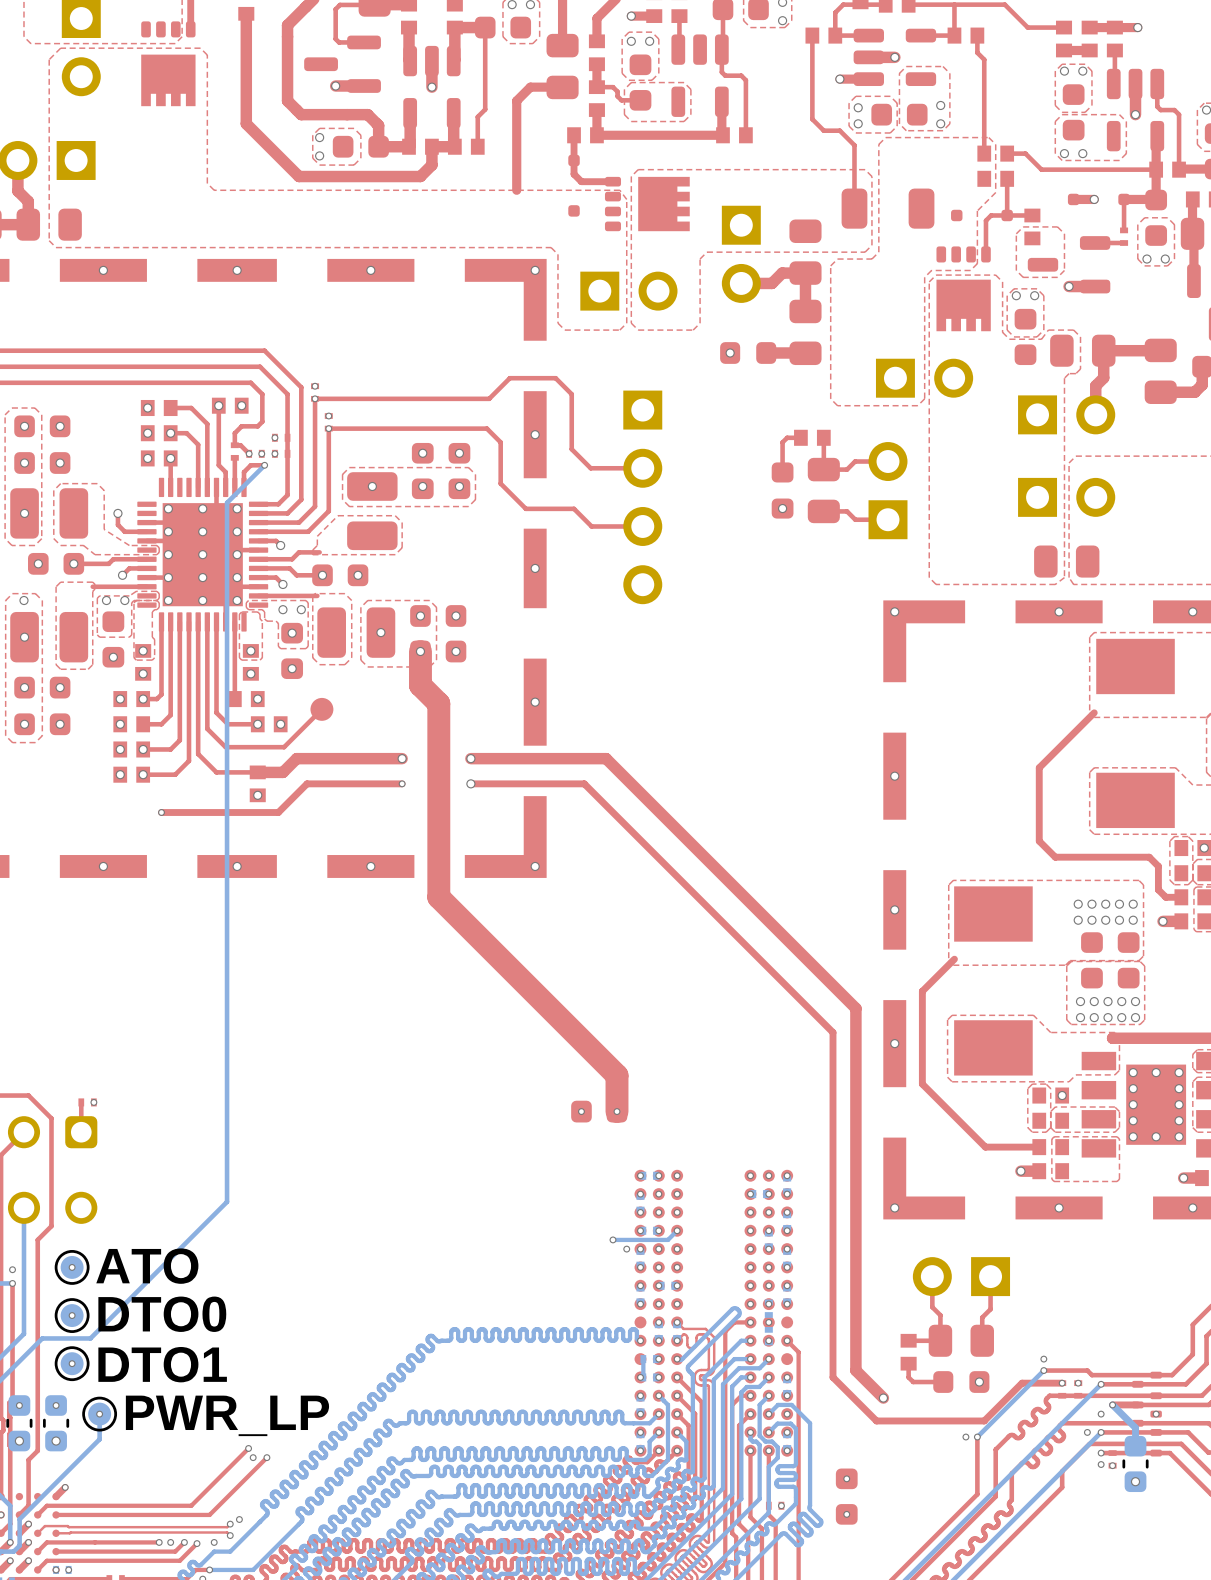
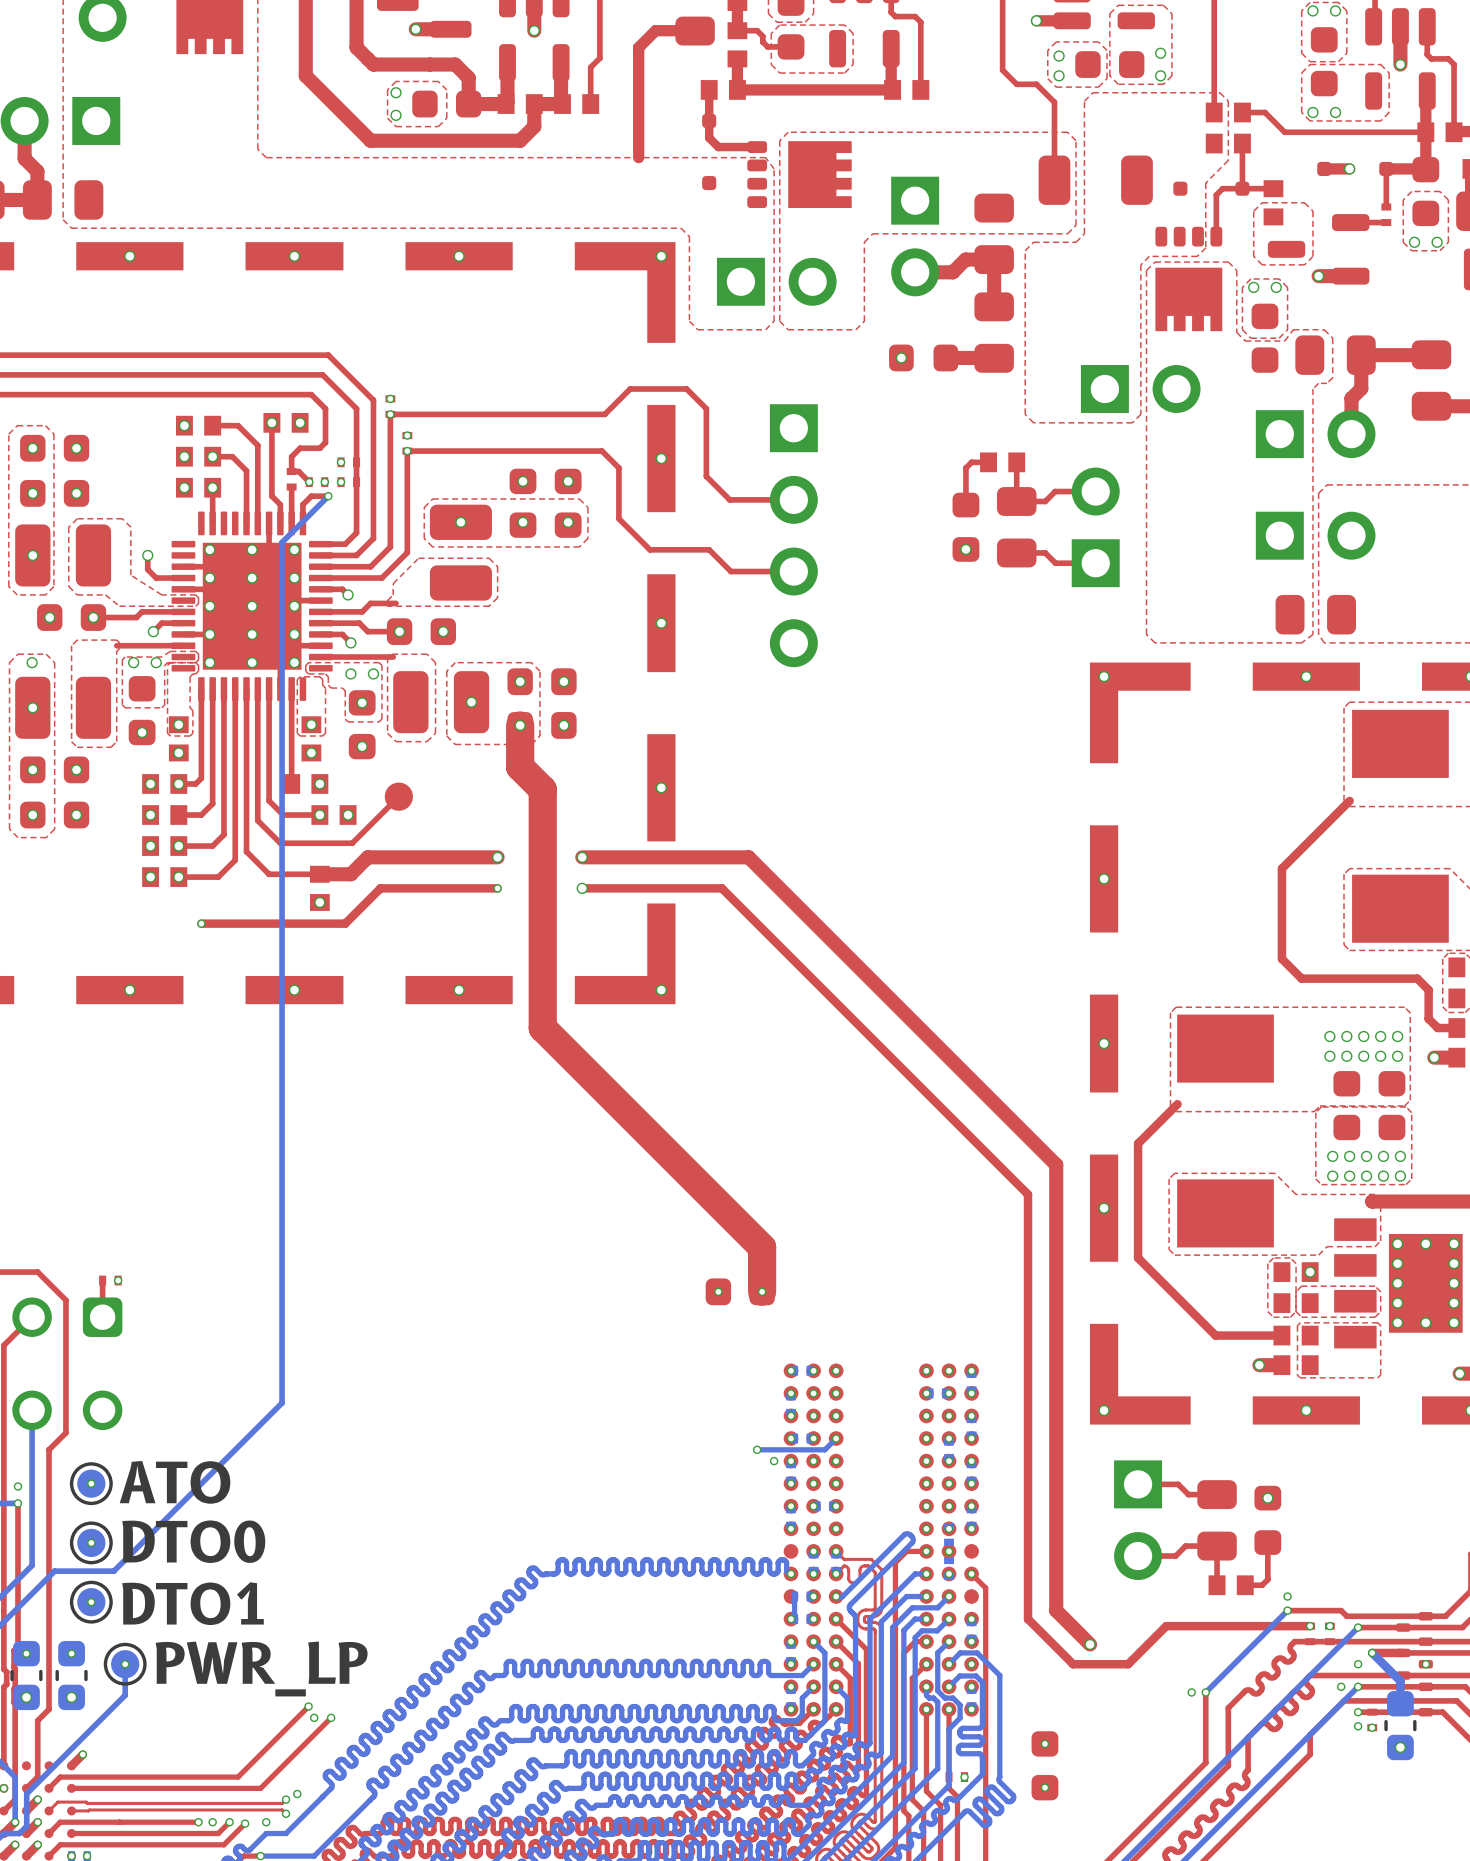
top track: none -> (1138, 1484) (1178, 1484) (1188, 1494) (1217, 1494)
top track: (932, 1276) (932, 1307) (940, 1315) (940, 1340) (908, 1340) -> none
part rotation: 0° (961, 1276) -> 90° counterclockwise (1138, 1520)
top track: (990, 1276) (990, 1309) (982, 1317) (982, 1340) -> none
top track: none -> (1267, 1542) (1267, 1579) (1262, 1585) (1245, 1585)
top track: none -> (1138, 1556) (1175, 1556) (1185, 1546) (1217, 1546) (1217, 1585)
part rotation: 0° (961, 1340) -> 90° clockwise (1217, 1520)
part position: (961, 1340) -> (1217, 1520)
part rotation: 0° (908, 1352) -> 90° clockwise (1231, 1585)
part position: (908, 1352) -> (1231, 1585)
top track: (908, 1363) (908, 1377) (913, 1382) (943, 1382) -> none
part rotation: 0° (961, 1382) -> 90° clockwise (1267, 1520)
part position: (961, 1382) -> (1267, 1520)
via position: (979, 1382) -> (1267, 1498)
top track: (1022, 1383) (984, 1420) (876, 1420) (869, 1414) -> (1260, 1626) (1166, 1626) (1128, 1664) (1073, 1664)

